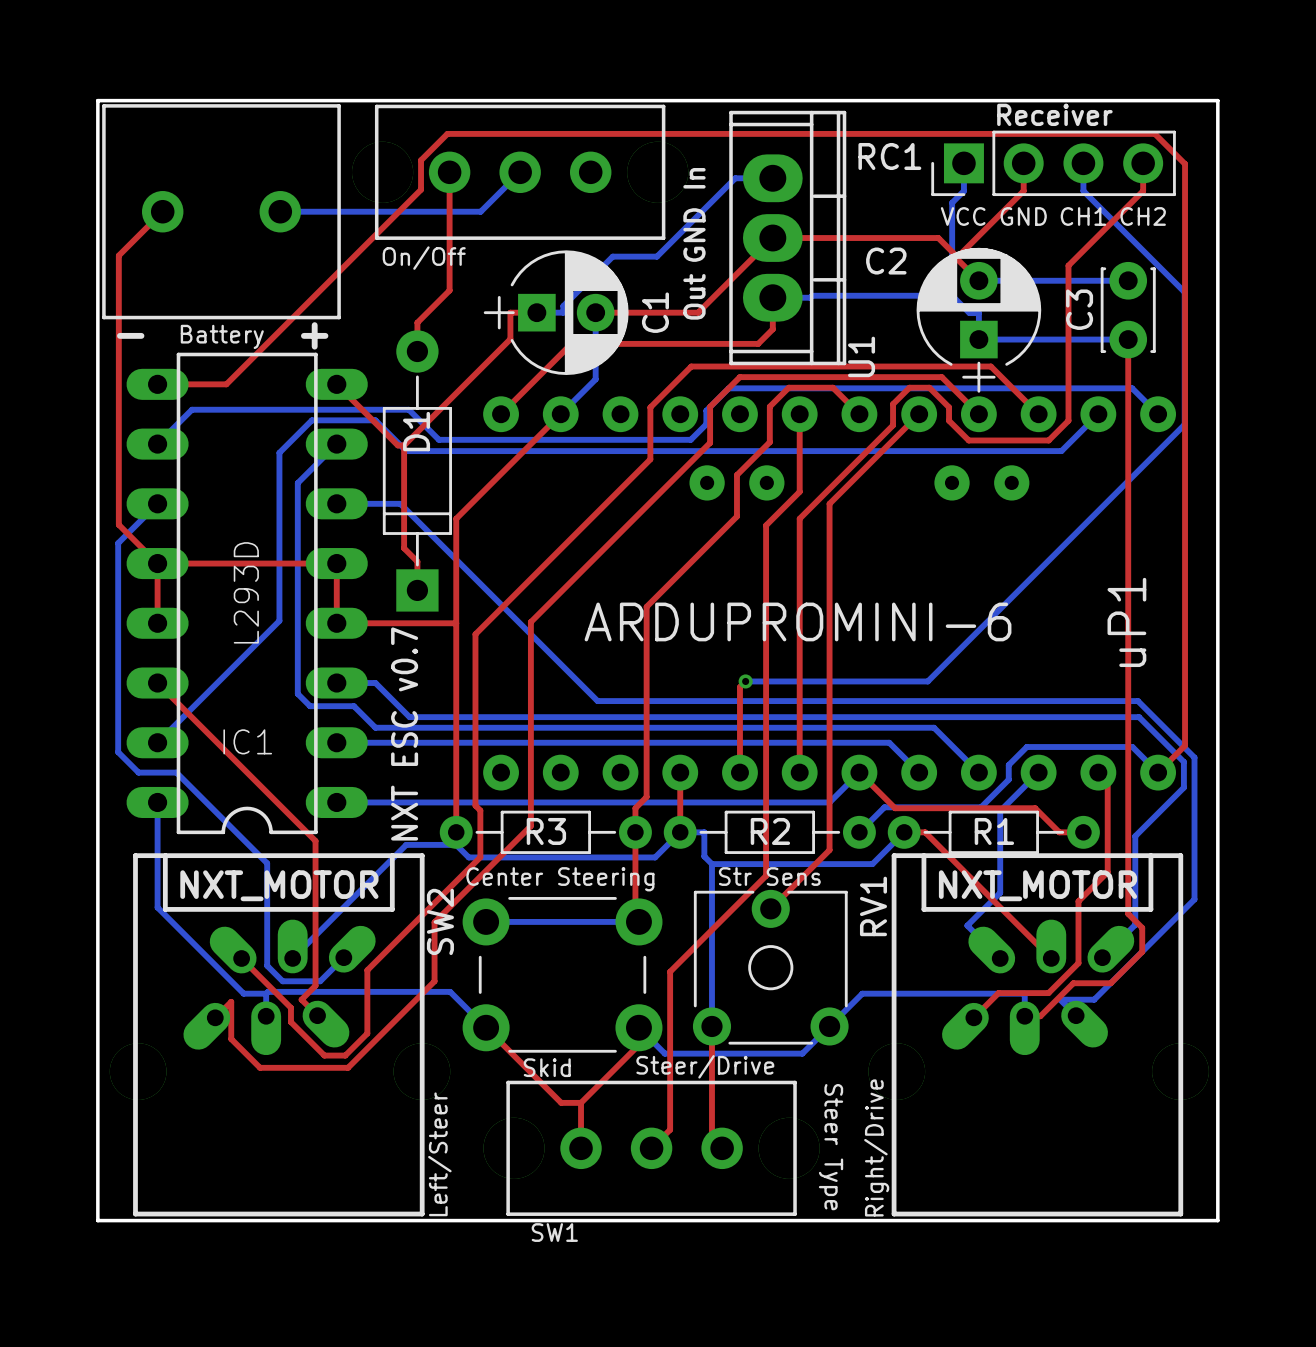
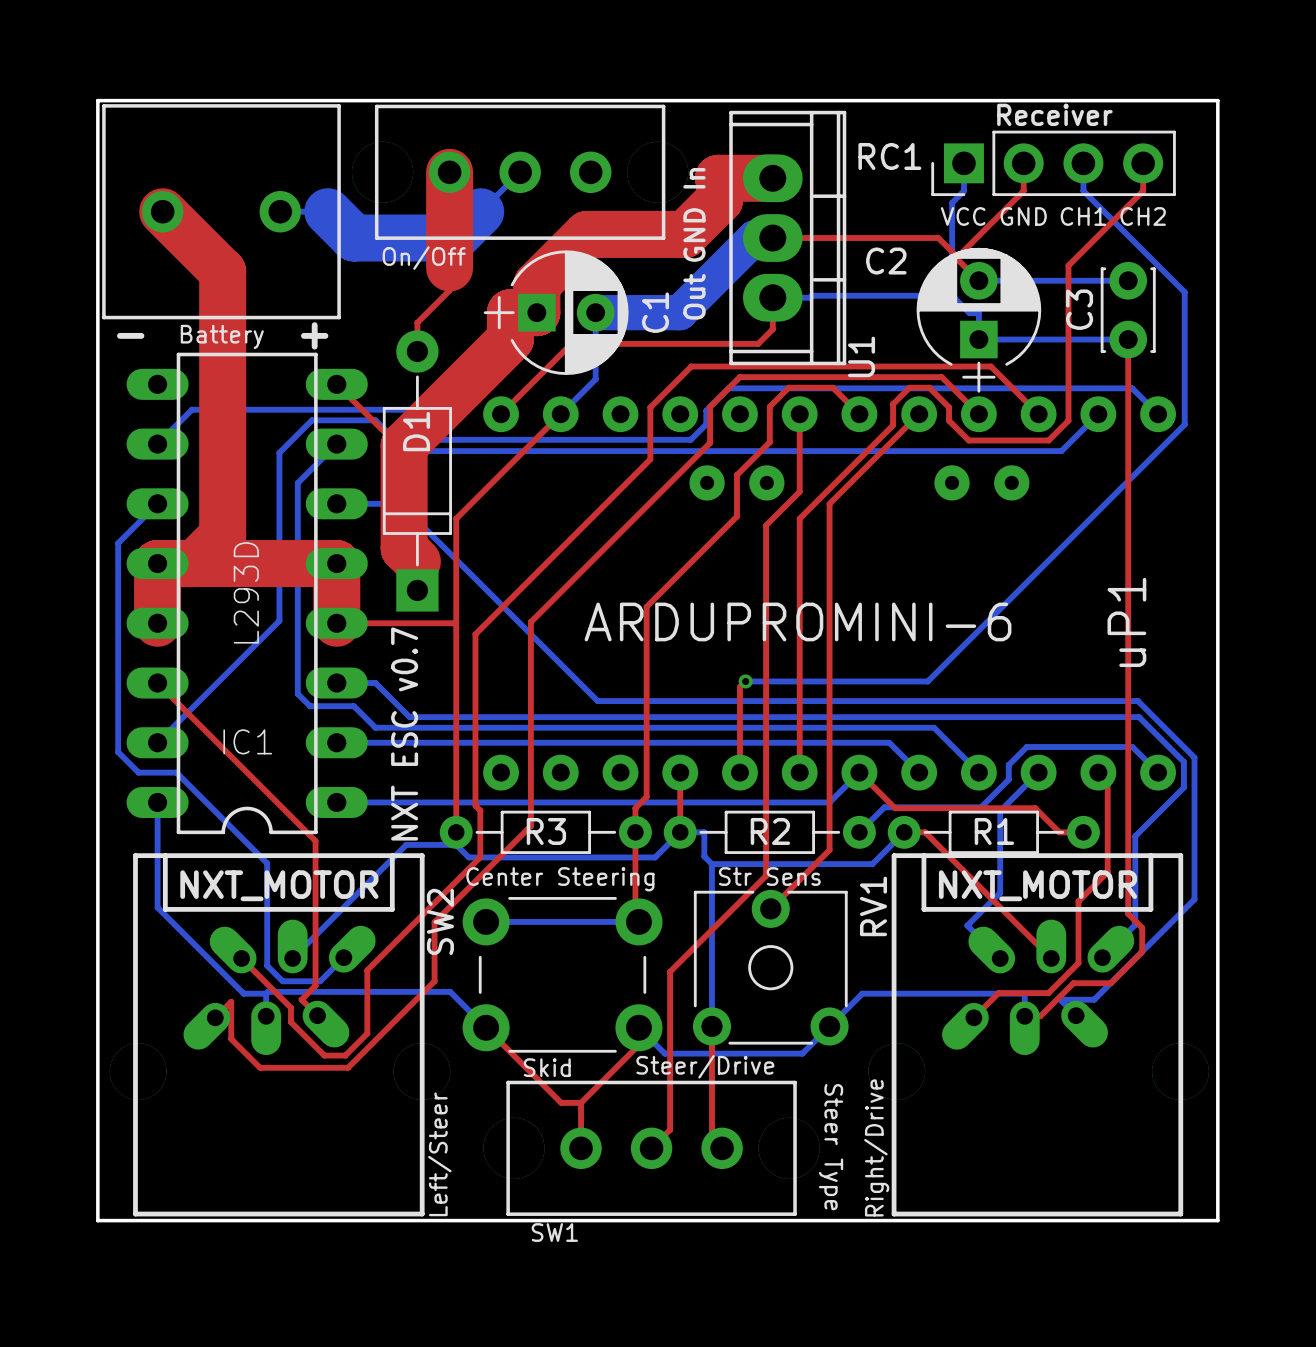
top track width: thin (449, 172) (449, 267) -> thick (449, 172) (449, 267)
bottom track: (772, 178) (735, 178) (656, 256) (612, 256) (563, 306) (563, 312) (536, 312) -> none
top track: none -> (772, 178) (718, 178) (719, 199) (685, 234) (587, 234) (536, 284) (536, 312)
top track: (162, 211) (118, 255) (118, 524) (157, 563) -> (162, 211) (222, 271) (222, 535) (194, 563)
bottom track: (327, 211) (480, 211) -> (327, 211) (354, 238) (454, 238) (480, 211)
bottom track: none -> (772, 238) (754, 238) (679, 312) (595, 312)
top track: (772, 238) (698, 312) (595, 312) -> none
top track width: thin (536, 312) (510, 312) (510, 339) (404, 445) (404, 548) (417, 561) -> thick (536, 312) (510, 312) (510, 339) (404, 445) (404, 548) (417, 561)
top track: (157, 384) (226, 384) (421, 189) (421, 160) (447, 133) (1154, 133) (1185, 164) (1185, 745) (1158, 772) -> none
top track width: thin (157, 623) (157, 563) (336, 563) (336, 623) -> thick (157, 623) (157, 563) (336, 563) (336, 623)

